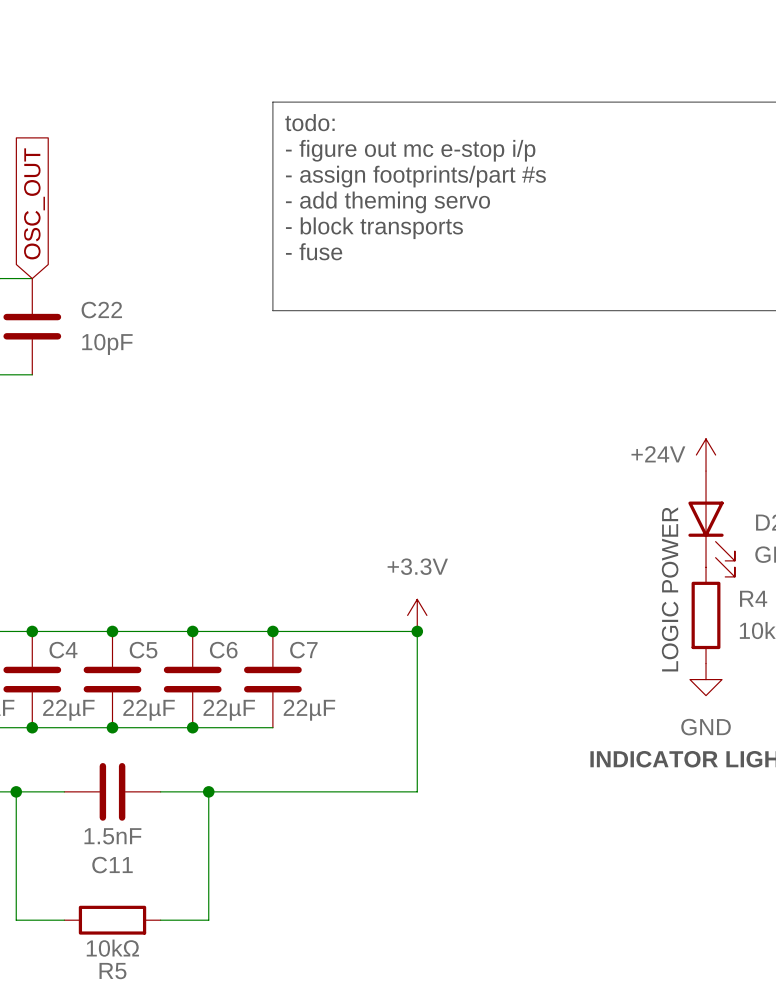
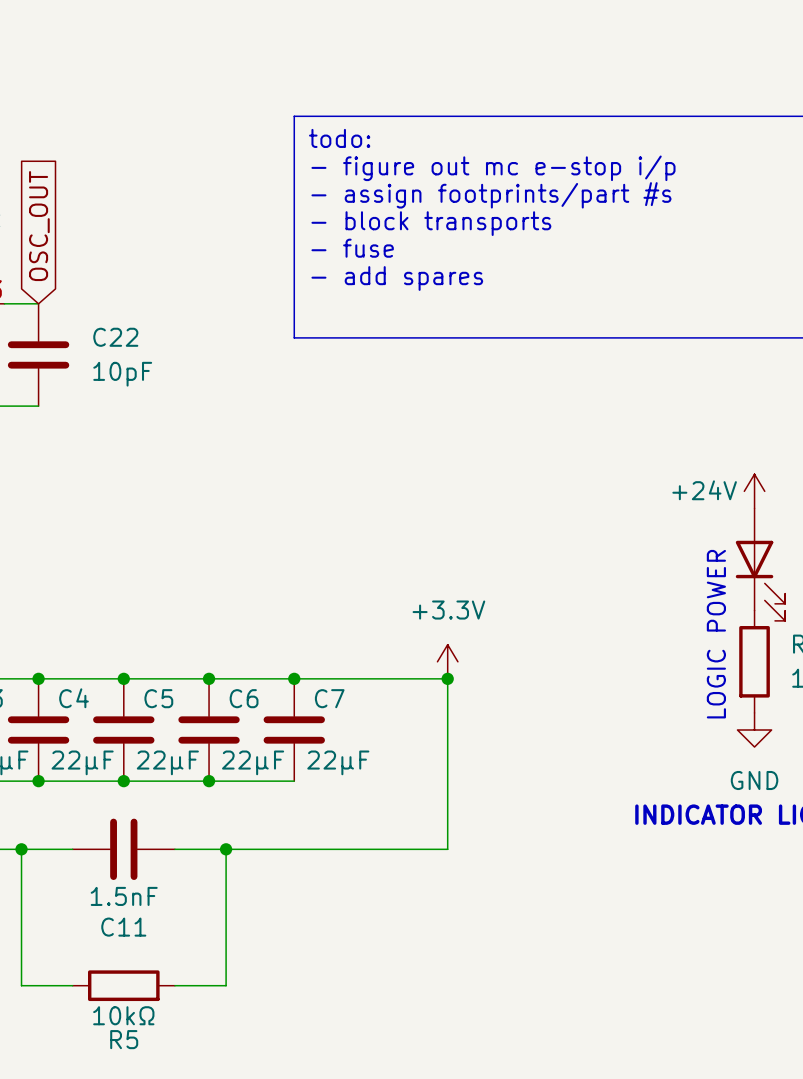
text: - add theming servo (388, 202) -> - block transports (431, 223)
text: - block transports (374, 228) -> - fuse (352, 248)
text: - fuse (314, 251) -> - add spares (397, 278)

